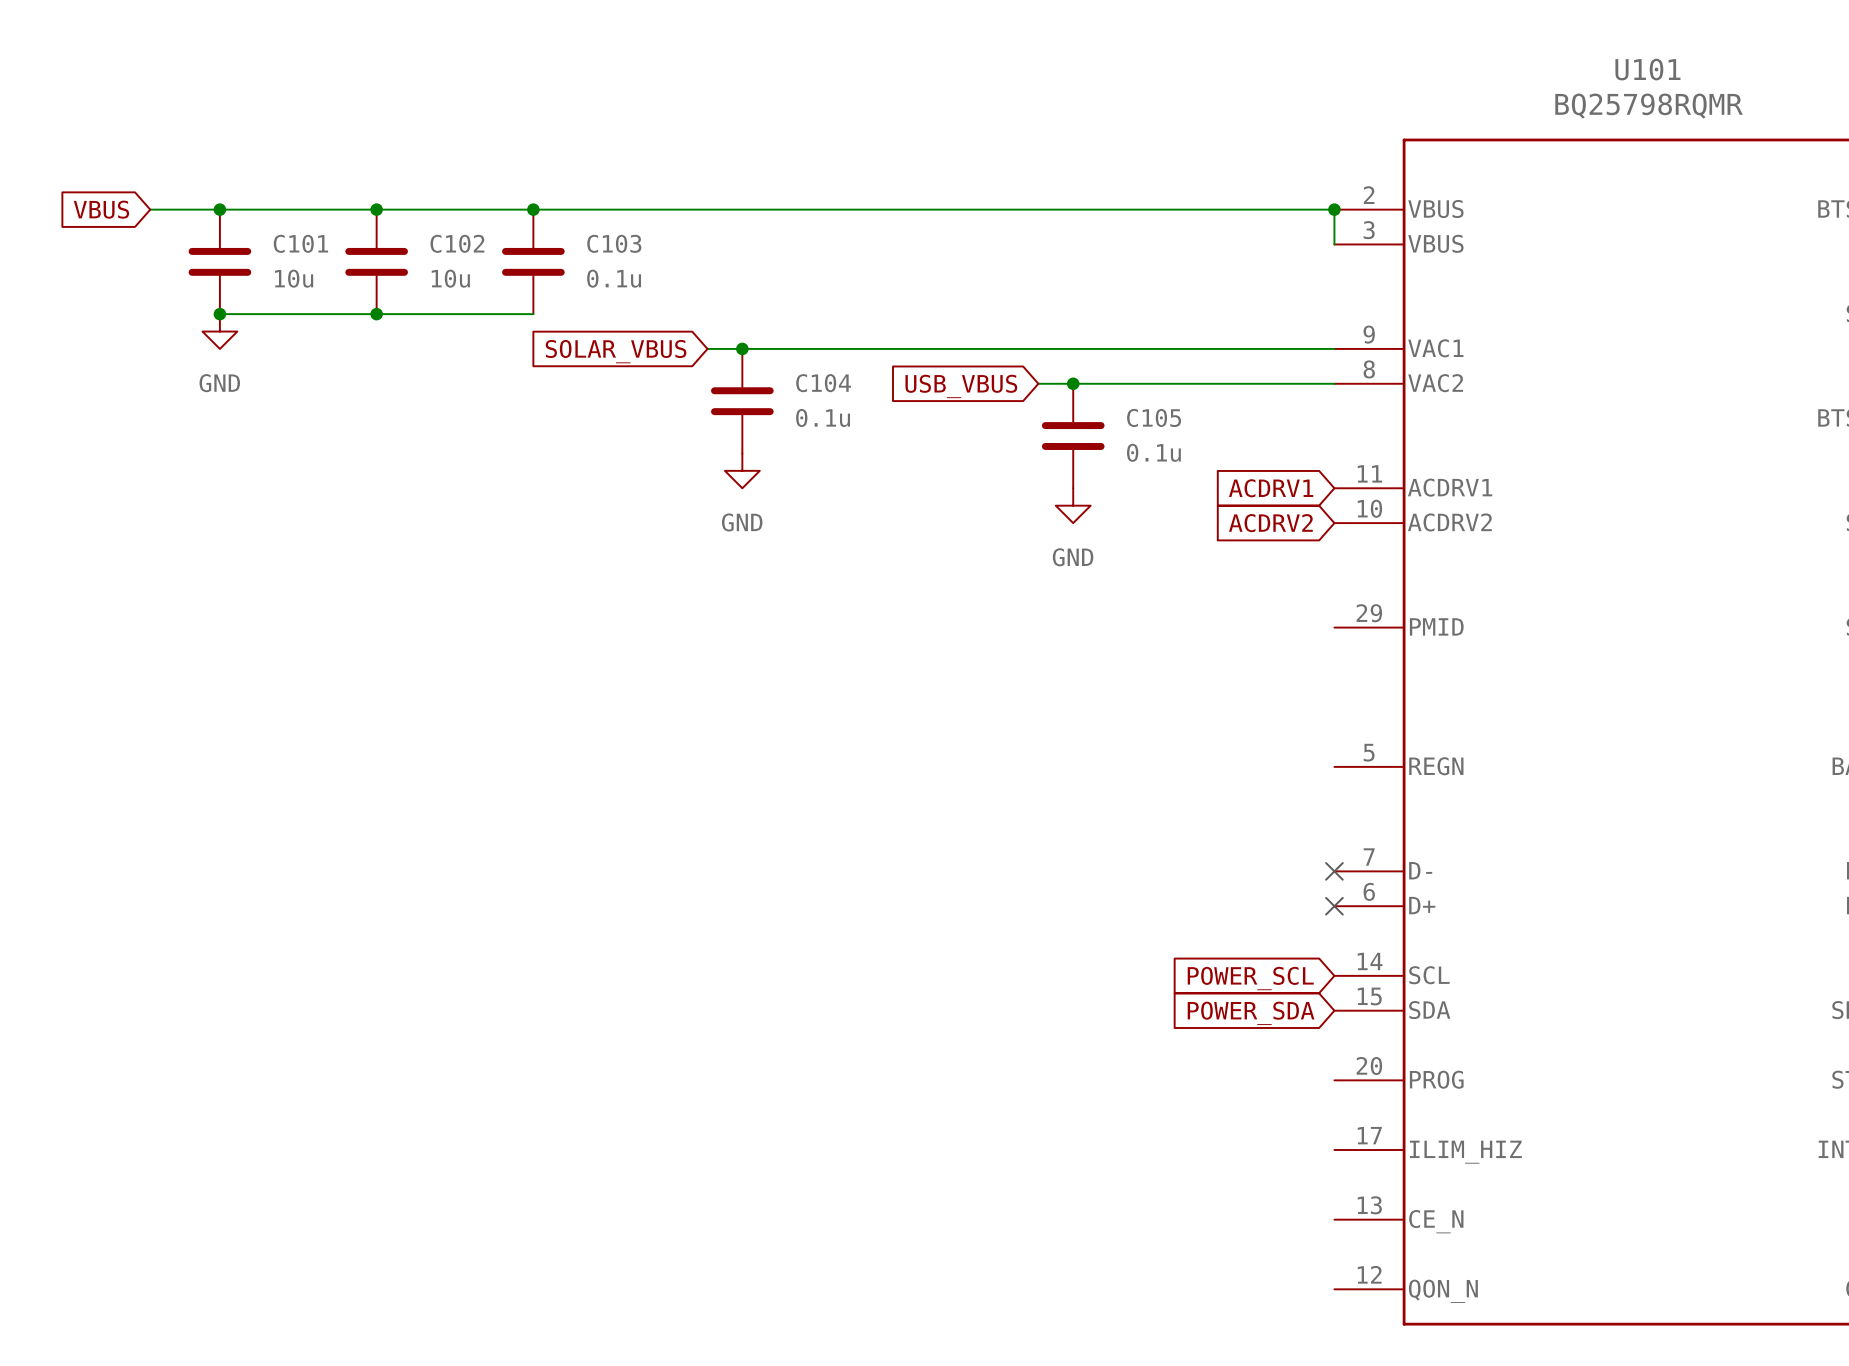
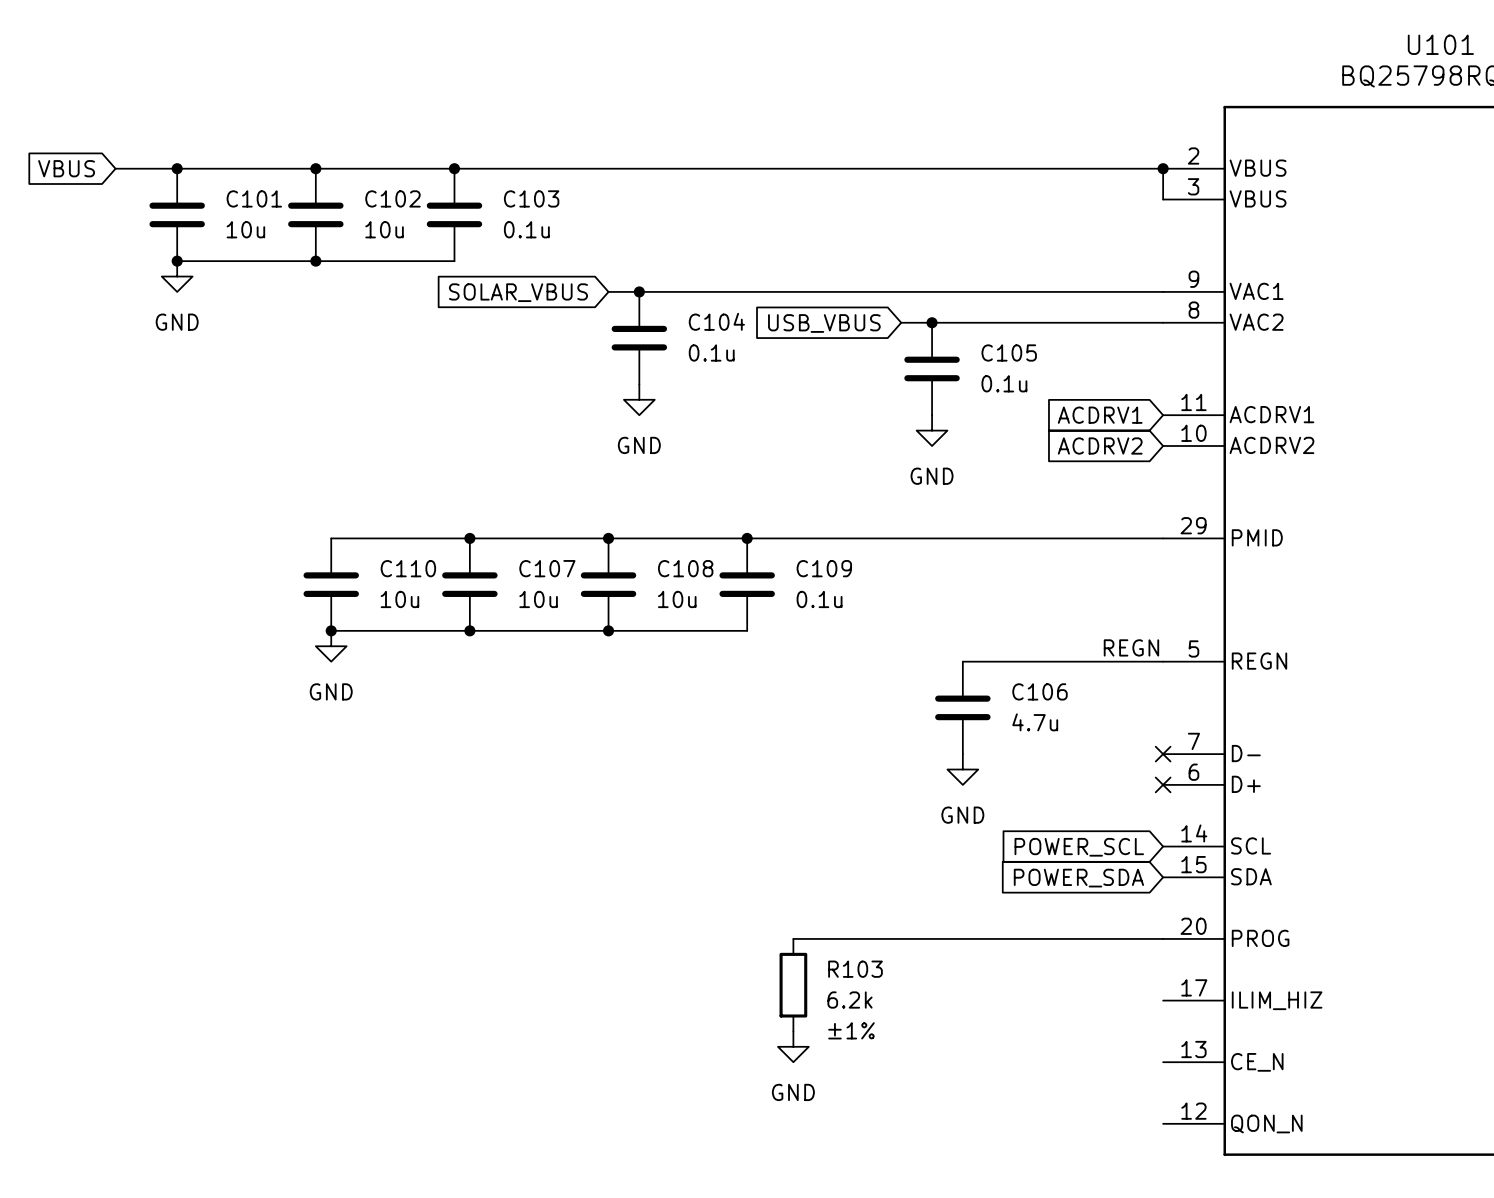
wire: none -> (331, 538) (1163, 538)
junction: none -> (469, 538)
junction: none -> (608, 538)
junction: none -> (747, 538)
C110: none -> 10u (331, 584)
C107: none -> 10u (469, 584)
C108: none -> 10u (608, 584)
C109: none -> 0.1u (747, 584)
wire: none -> (331, 630) (747, 630)
junction: none -> (331, 630)
junction: none -> (469, 630)
junction: none -> (608, 630)
power symbol: none -> GND (331, 646)
label: none -> REGN (1131, 647)
wire: none -> (962, 661) (1163, 661)
C106: none -> 4.7u (962, 707)
power symbol: none -> GND (962, 769)
wire: none -> (793, 938) (1163, 938)
R103: none -> 6.2k (793, 985)
power symbol: none -> GND (793, 1046)

